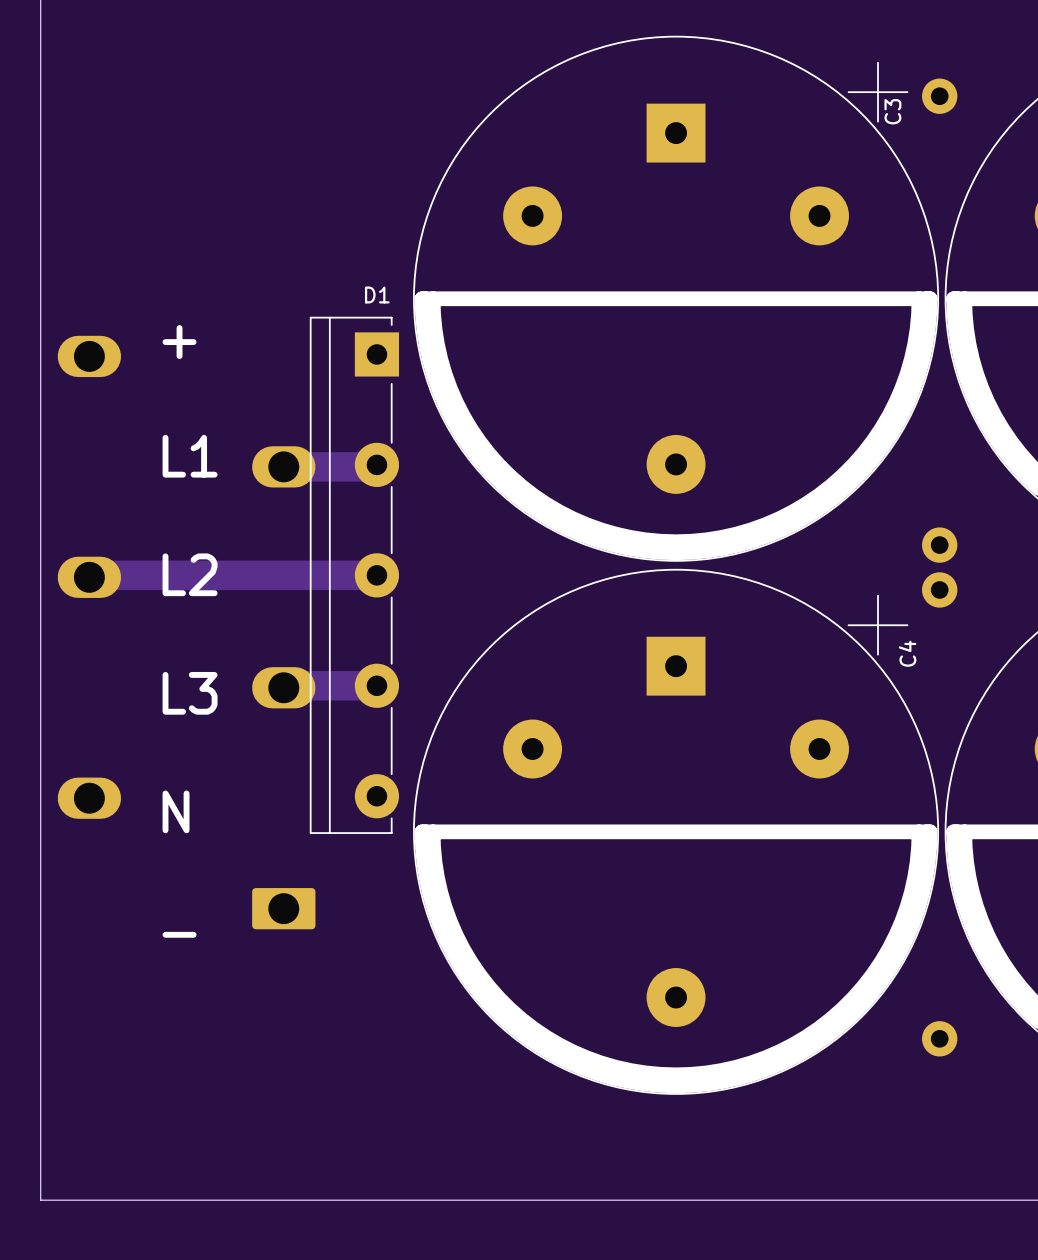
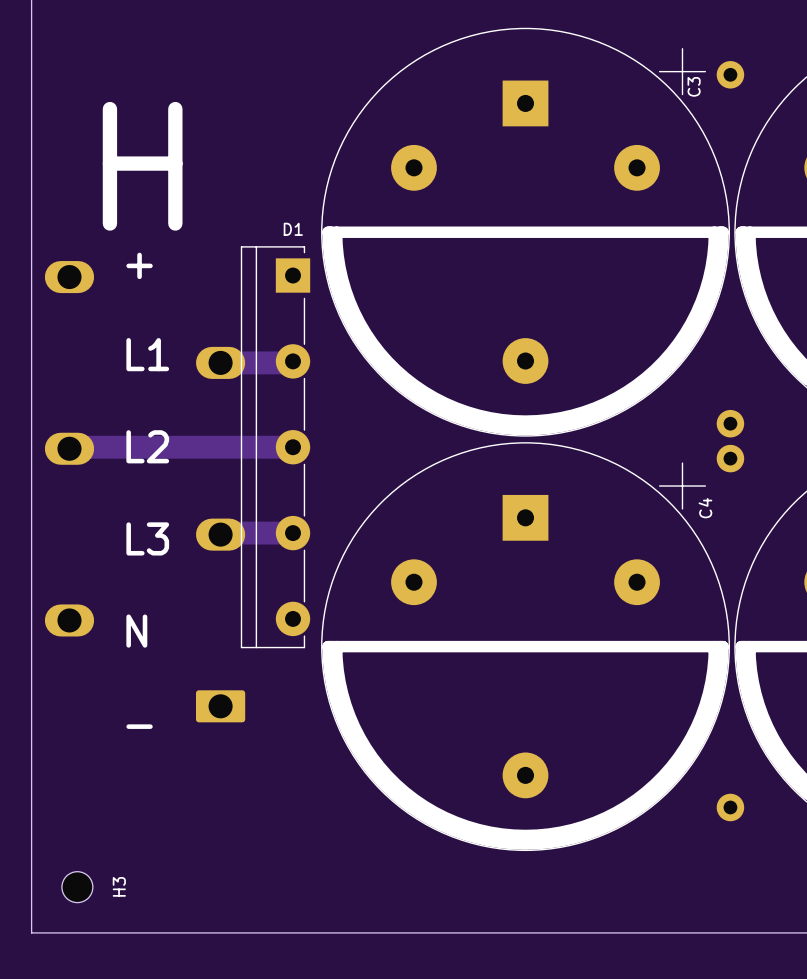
text: none -> H (142, 166)
H3: none -> (77, 887)

